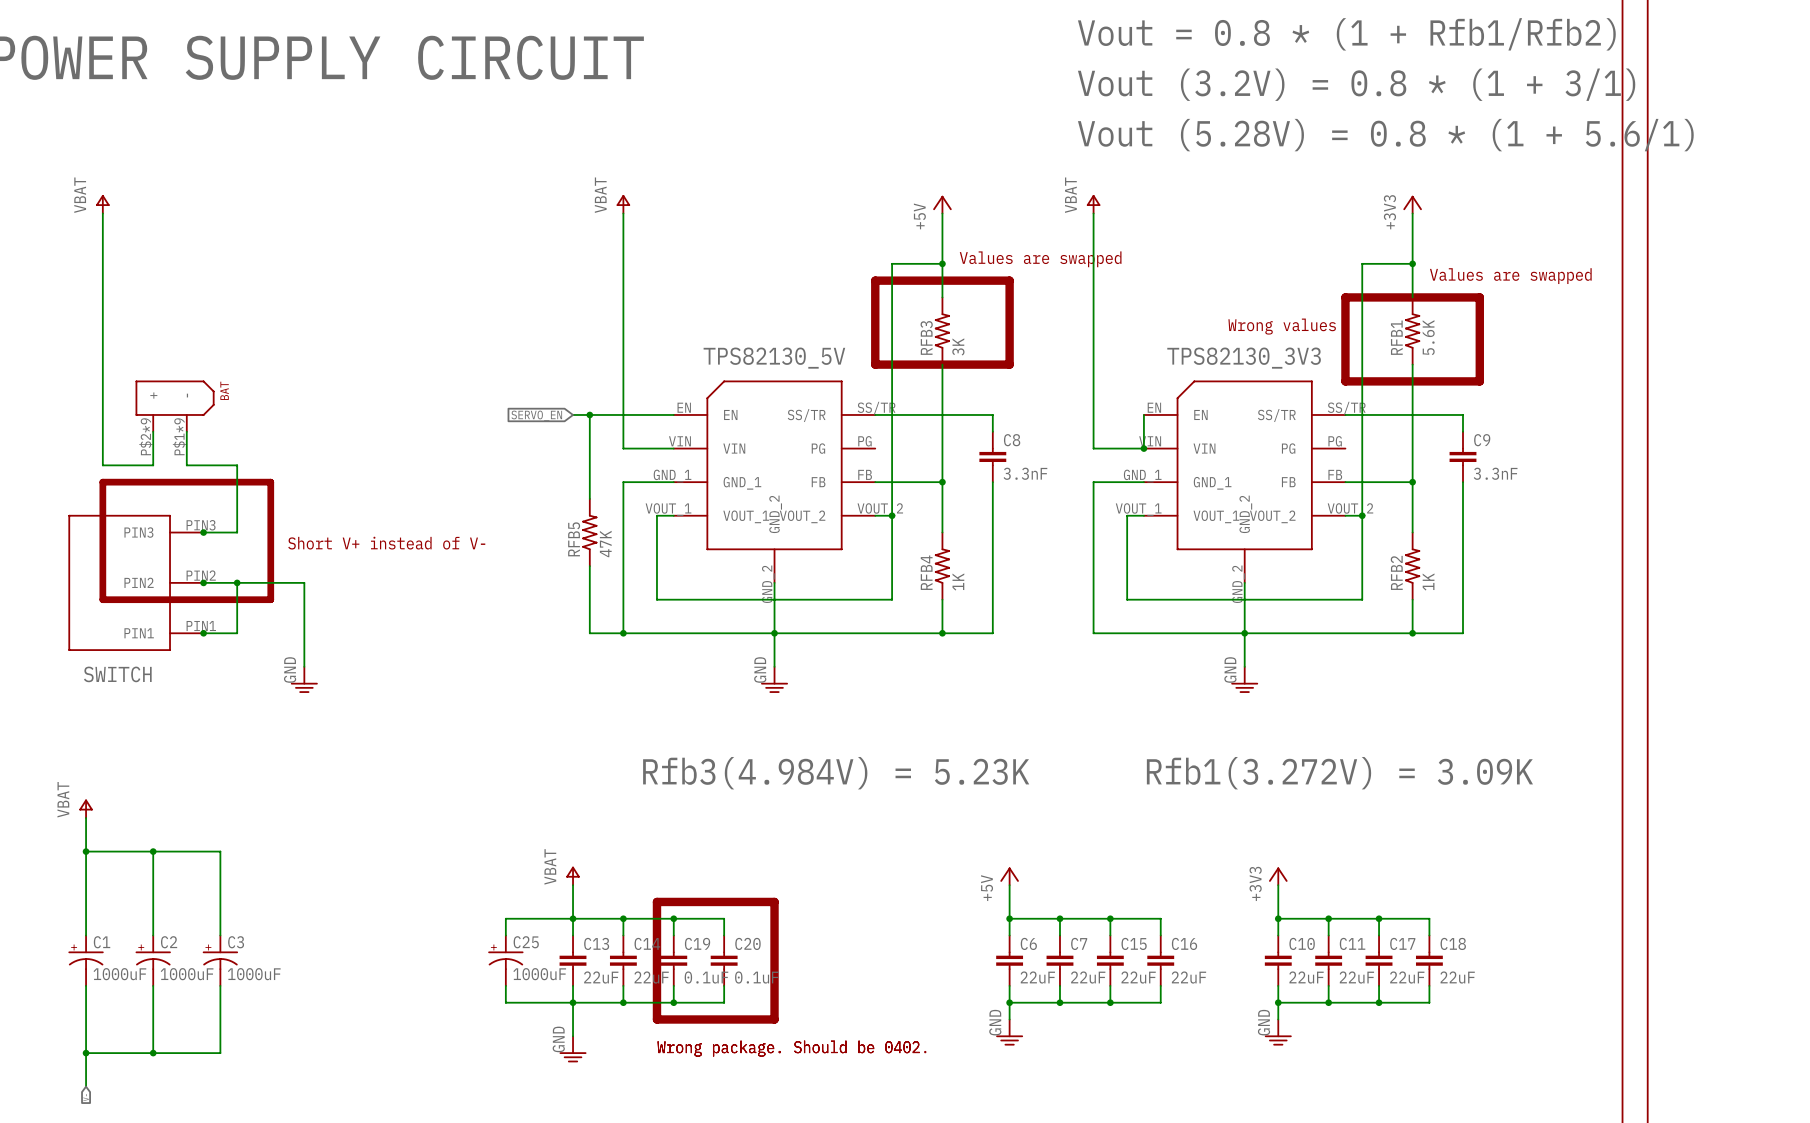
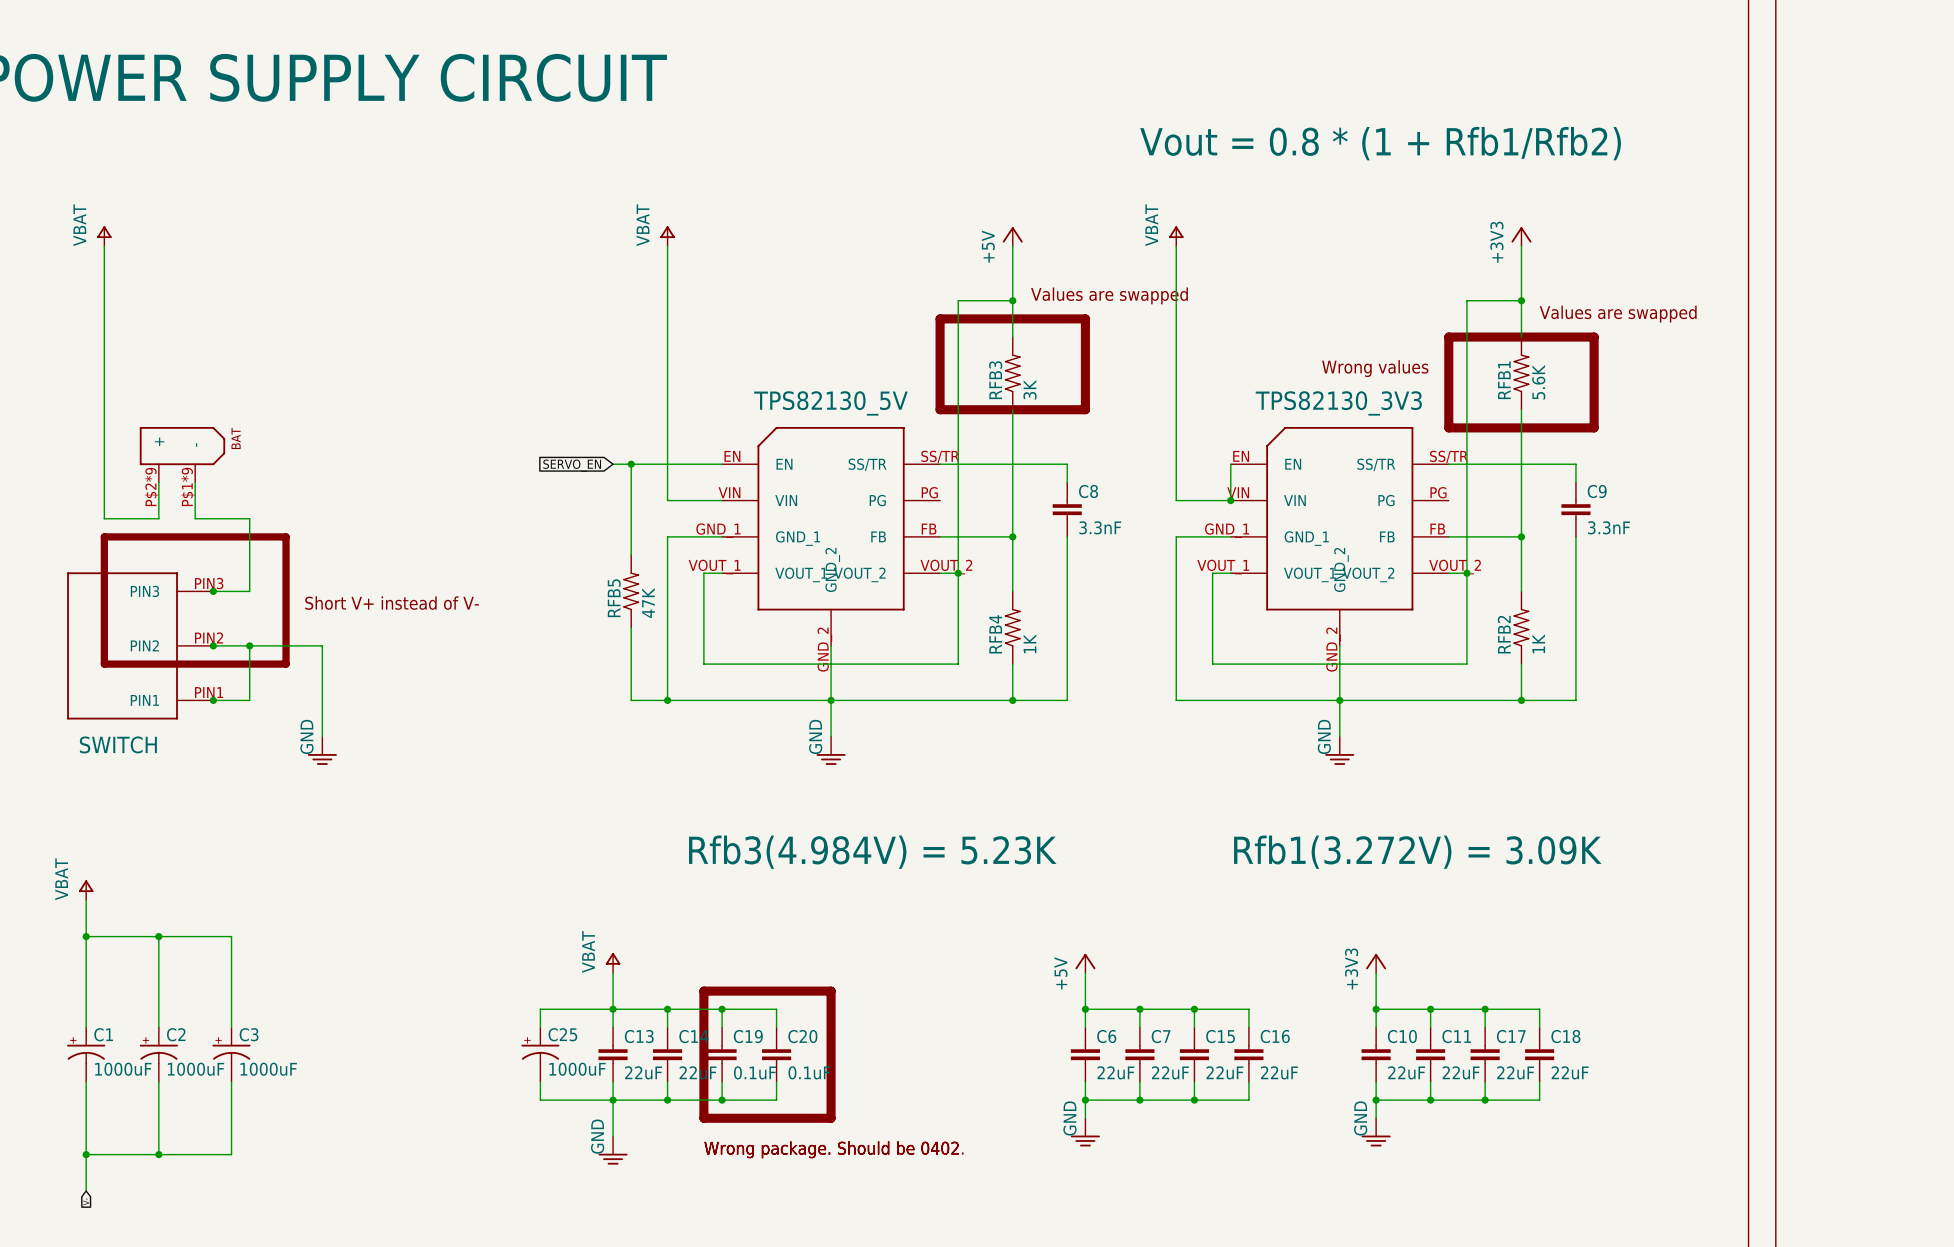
text position: Vout = 0.8 * (1 + Rfb1/Rfb2) (1346, 34) -> Vout = 0.8 * (1 + Rfb1/Rfb2) (1380, 143)
text: Vout (3.2V) = 0.8 * (1 + 3/1) (1356, 84) -> none
text: Vout (5.28V) = 0.8 * (1 + 5.6/1) (1385, 135) -> none

